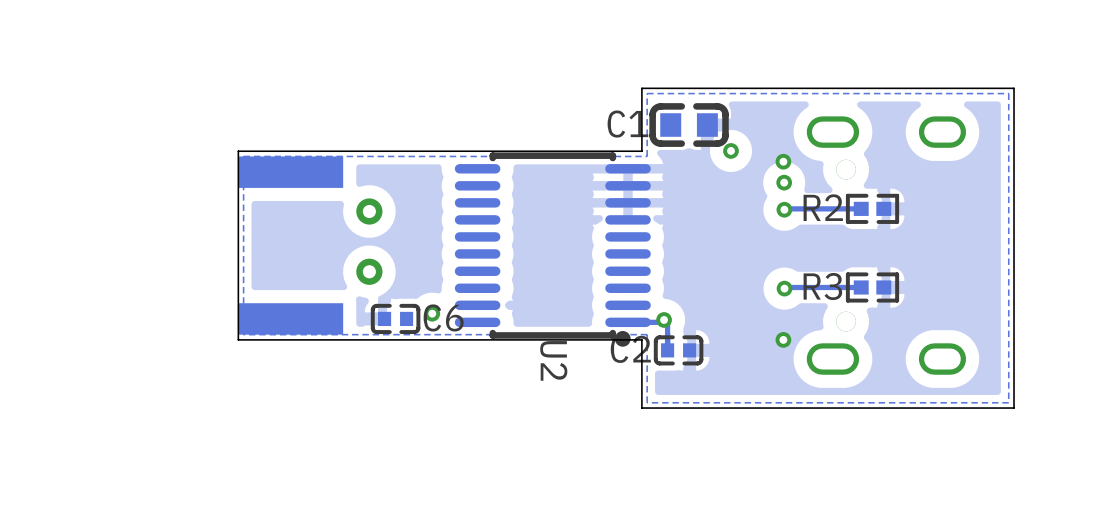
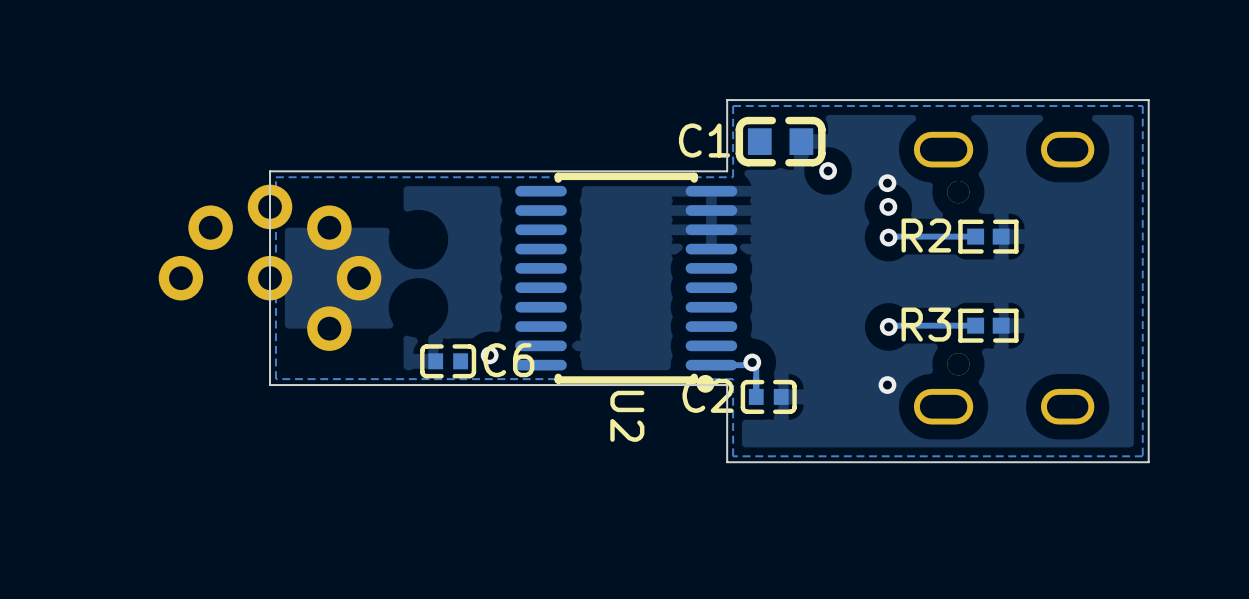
part: none -> (270, 267)
part: (310, 245) -> none

